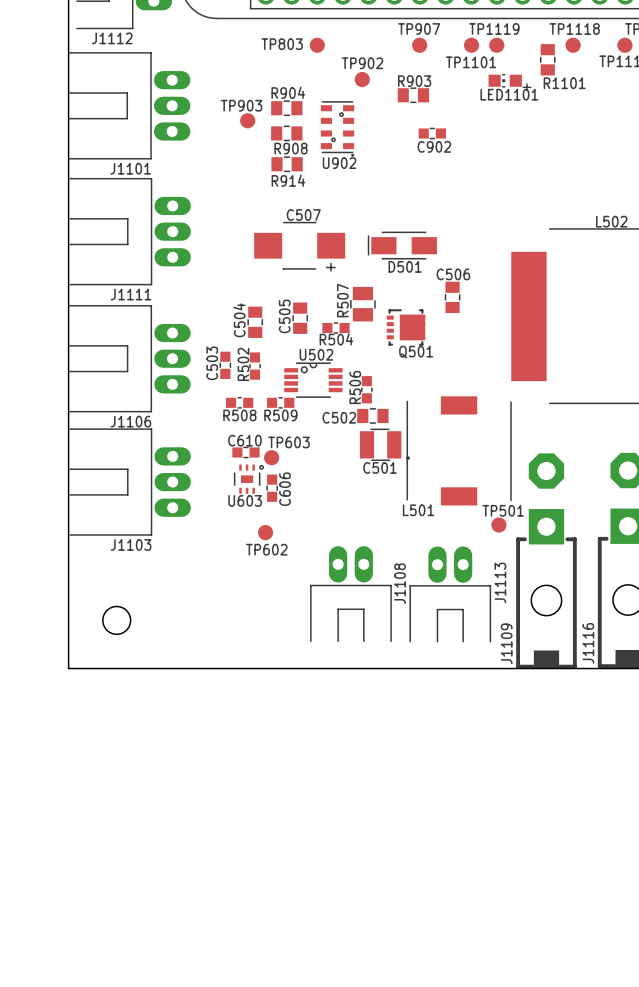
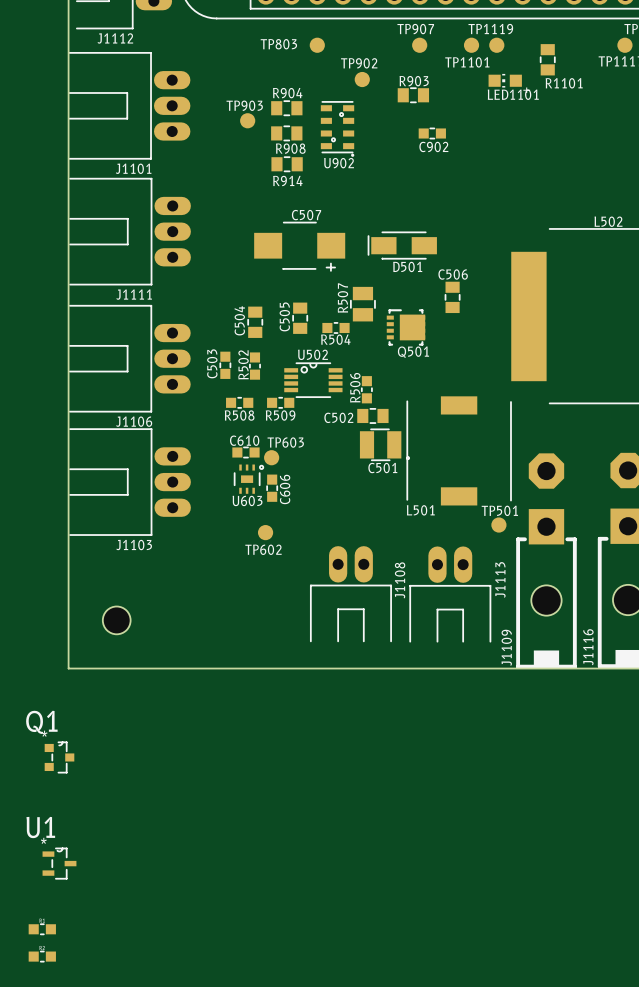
TP1118: (573, 45) -> none
Q1: none -> (59, 757)
U1: none -> (59, 863)
part: none -> (42, 929)
part: none -> (42, 956)

